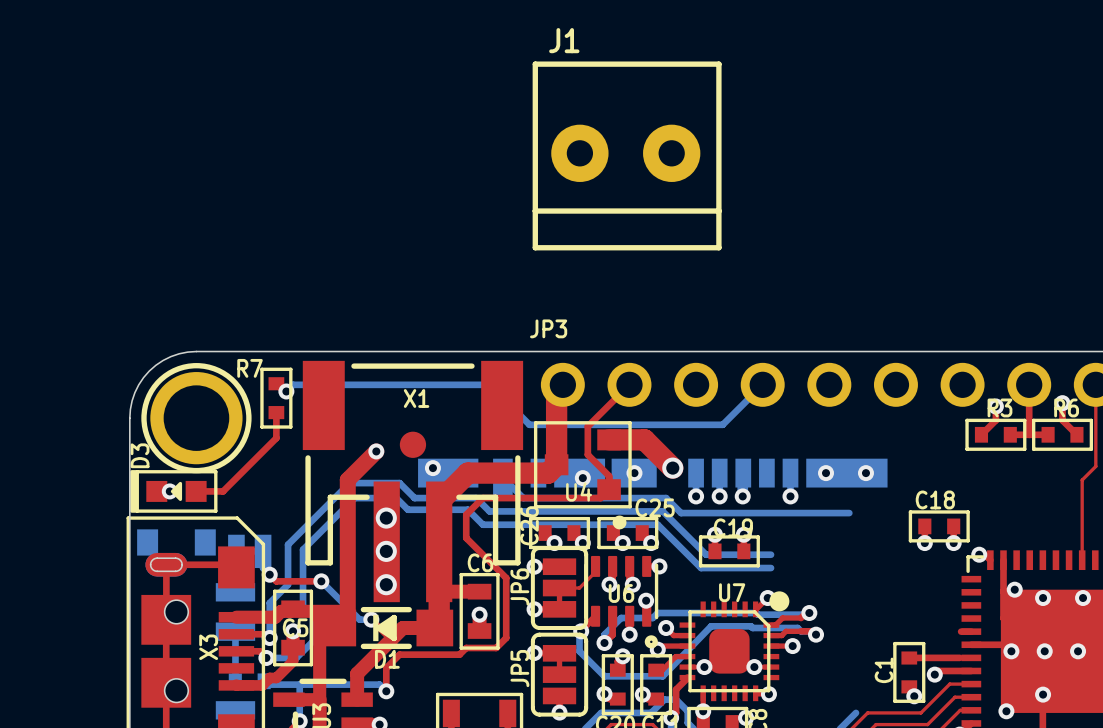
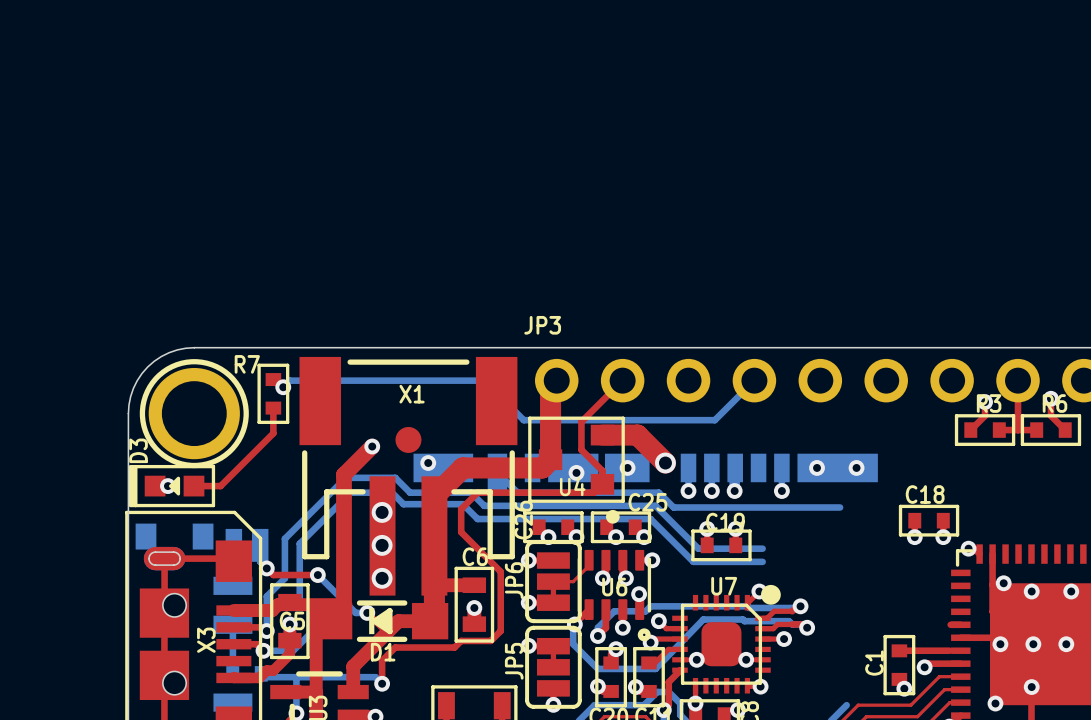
J1: (627, 155) -> none
top track: (1095, 384) (1095, 466) (1082, 480) (1082, 560) -> none

